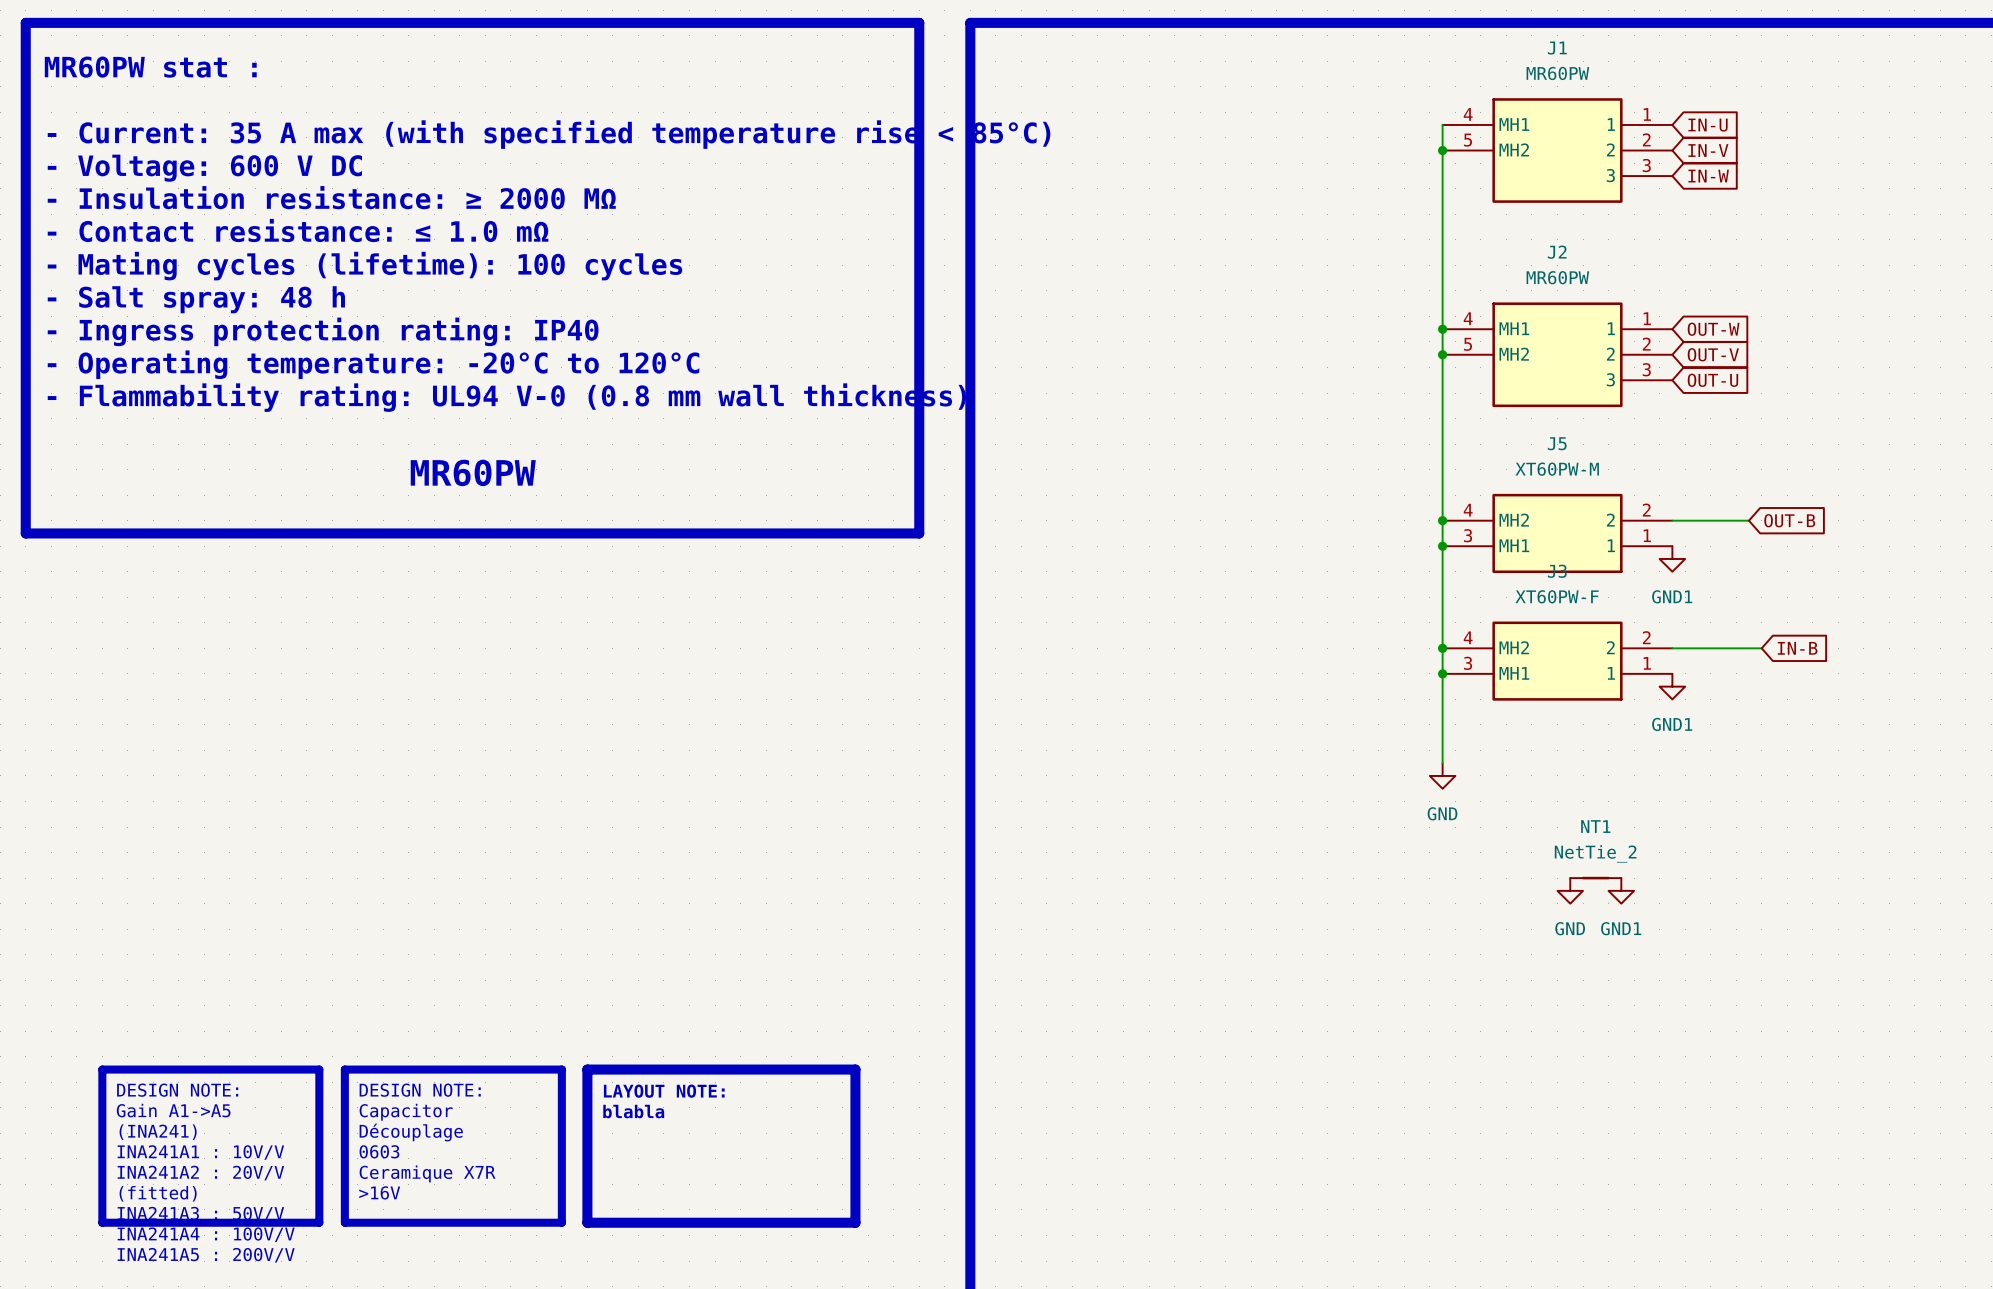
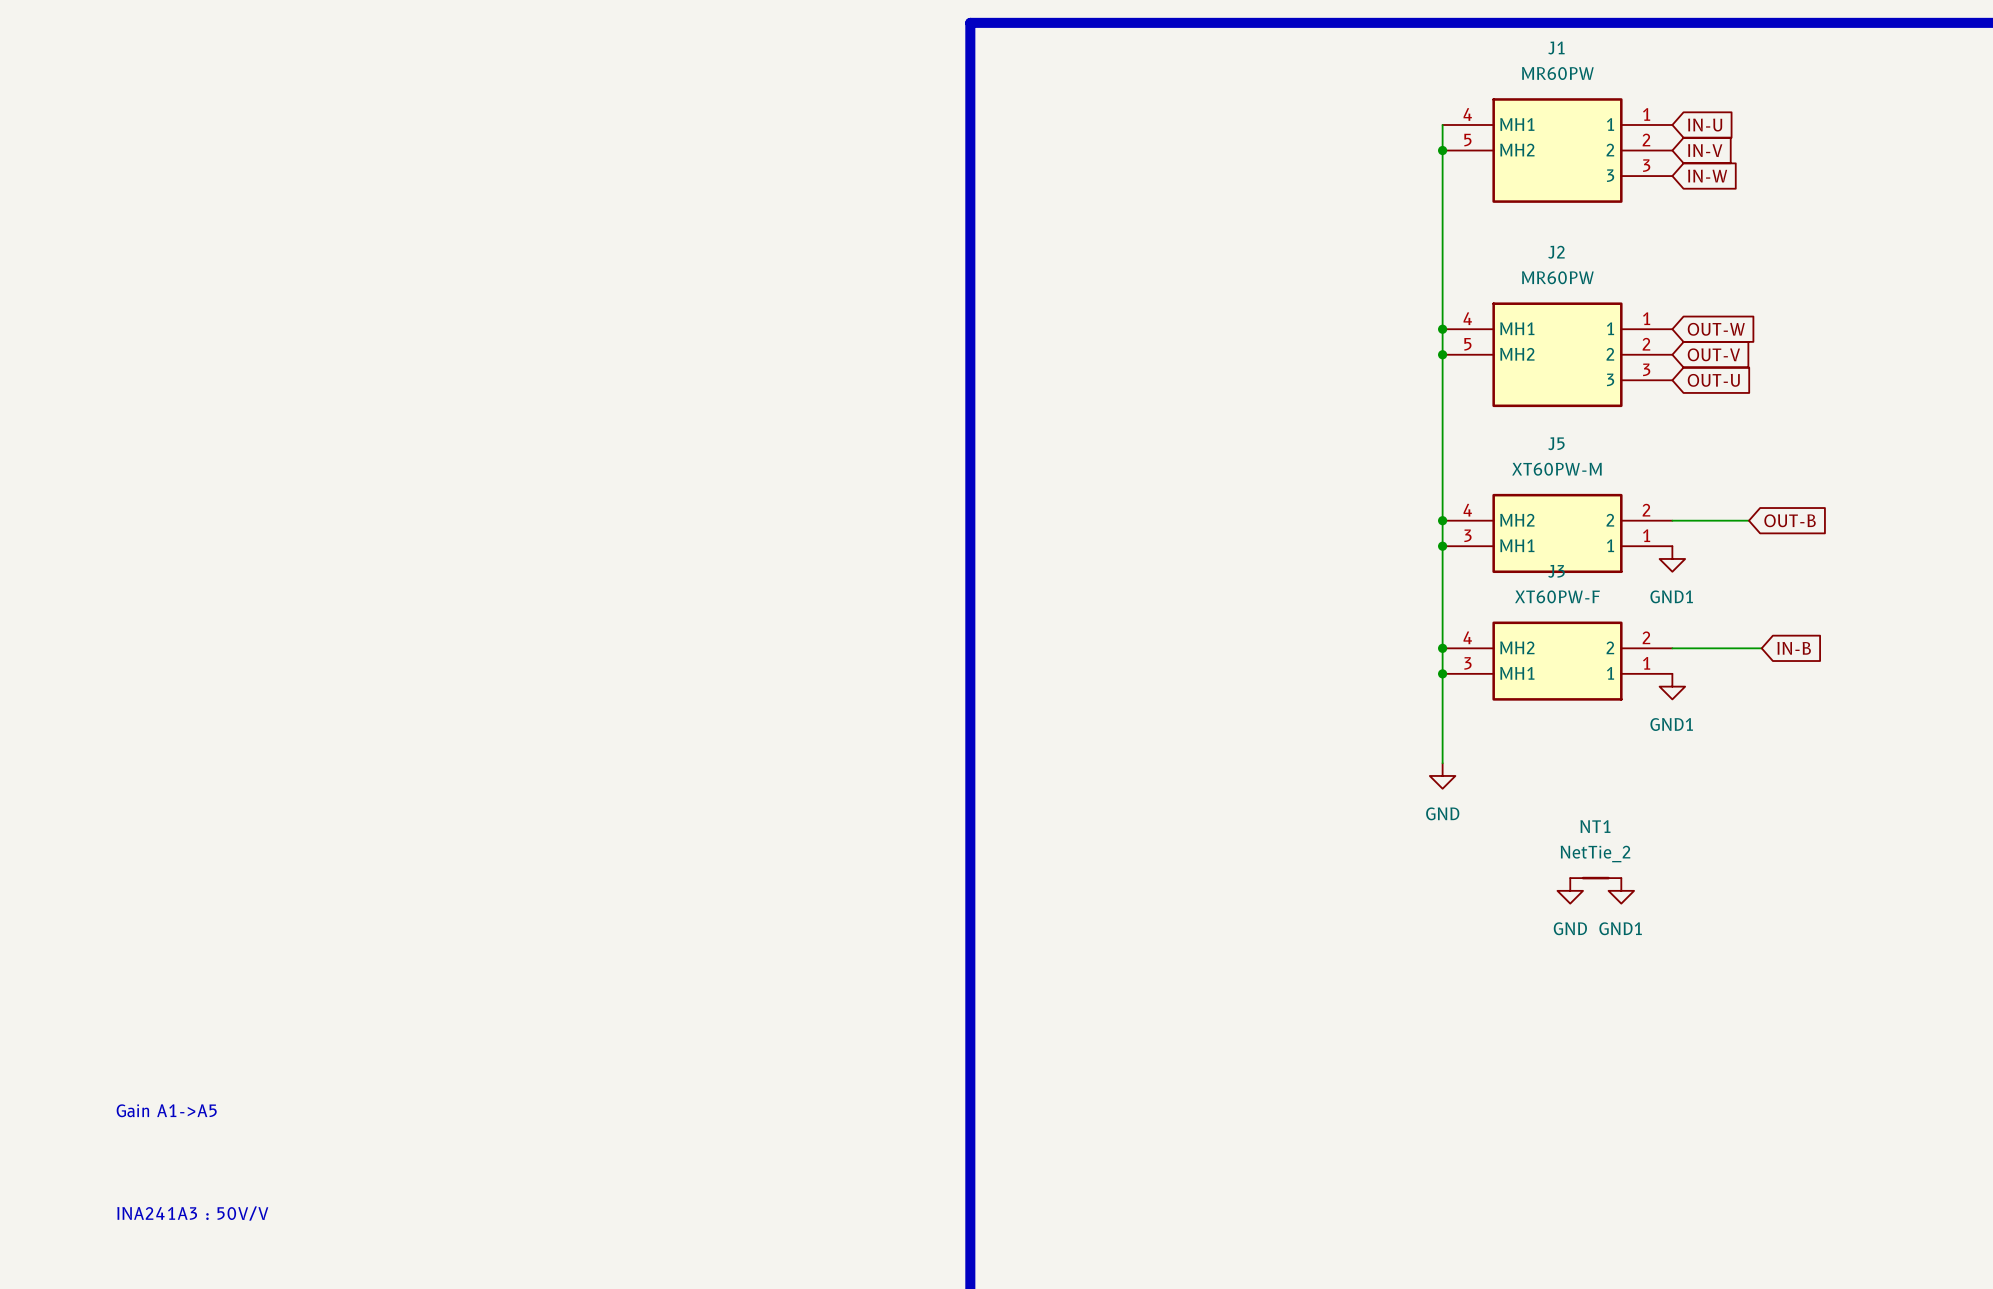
line: (25, 22) (919, 22) (919, 533) (25, 533) (25, 22) -> none
text: MR60PW stat : (150, 67) -> none
text: - Current: 35 A max (with specified temperature rise < 85°C) (549, 134) -> none
text: - Voltage: 600 V DC (204, 168) -> none
text: - Insulation resistance: ≥ 2000 MΩ (331, 197) -> none
text: - Contact resistance: ≤ 1.0 mΩ (298, 230) -> none
text: - Mating cycles (lifetime): 100 cycles (364, 266) -> none
text: - Salt spray: 48 h (196, 299) -> none
text: - Ingress protection rating: IP40 (323, 331) -> none
text: - Operating temperature: -20°C to 120°C (373, 364) -> none
text: - Flammability rating: UL94 V-0 (0.8 mm wall thickness) (506, 397) -> none
text: MR60PW (473, 472) -> none
line: (102, 1069) (319, 1069) (319, 1222) (102, 1222) (102, 1069) -> none
line: (344, 1069) (561, 1069) (561, 1222) (344, 1222) (344, 1069) -> none
line: (587, 1069) (855, 1069) (855, 1222) (587, 1222) (587, 1069) -> none
text: DESIGN NOTE: (177, 1090) -> none
text: DESIGN NOTE: (420, 1090) -> none
text: LAYOUT NOTE: (664, 1091) -> none
text: blabla (633, 1111) -> none
text: Capacitor (406, 1112) -> none
text: (INA241) (158, 1132) -> none
text: Découplage (411, 1132) -> none
text: 0603 (379, 1151) -> none
text: INA241A1 : 10V/V (200, 1152) -> none
text: INA241A2 : 20V/V (200, 1173) -> none
text: Ceramique X7R (427, 1173) -> none
text: >16V (379, 1192) -> none
text: (fitted) (158, 1193) -> none
text: INA241A4 : 100V/V (206, 1234) -> none
text: INA241A5 : 200V/V (206, 1255) -> none

